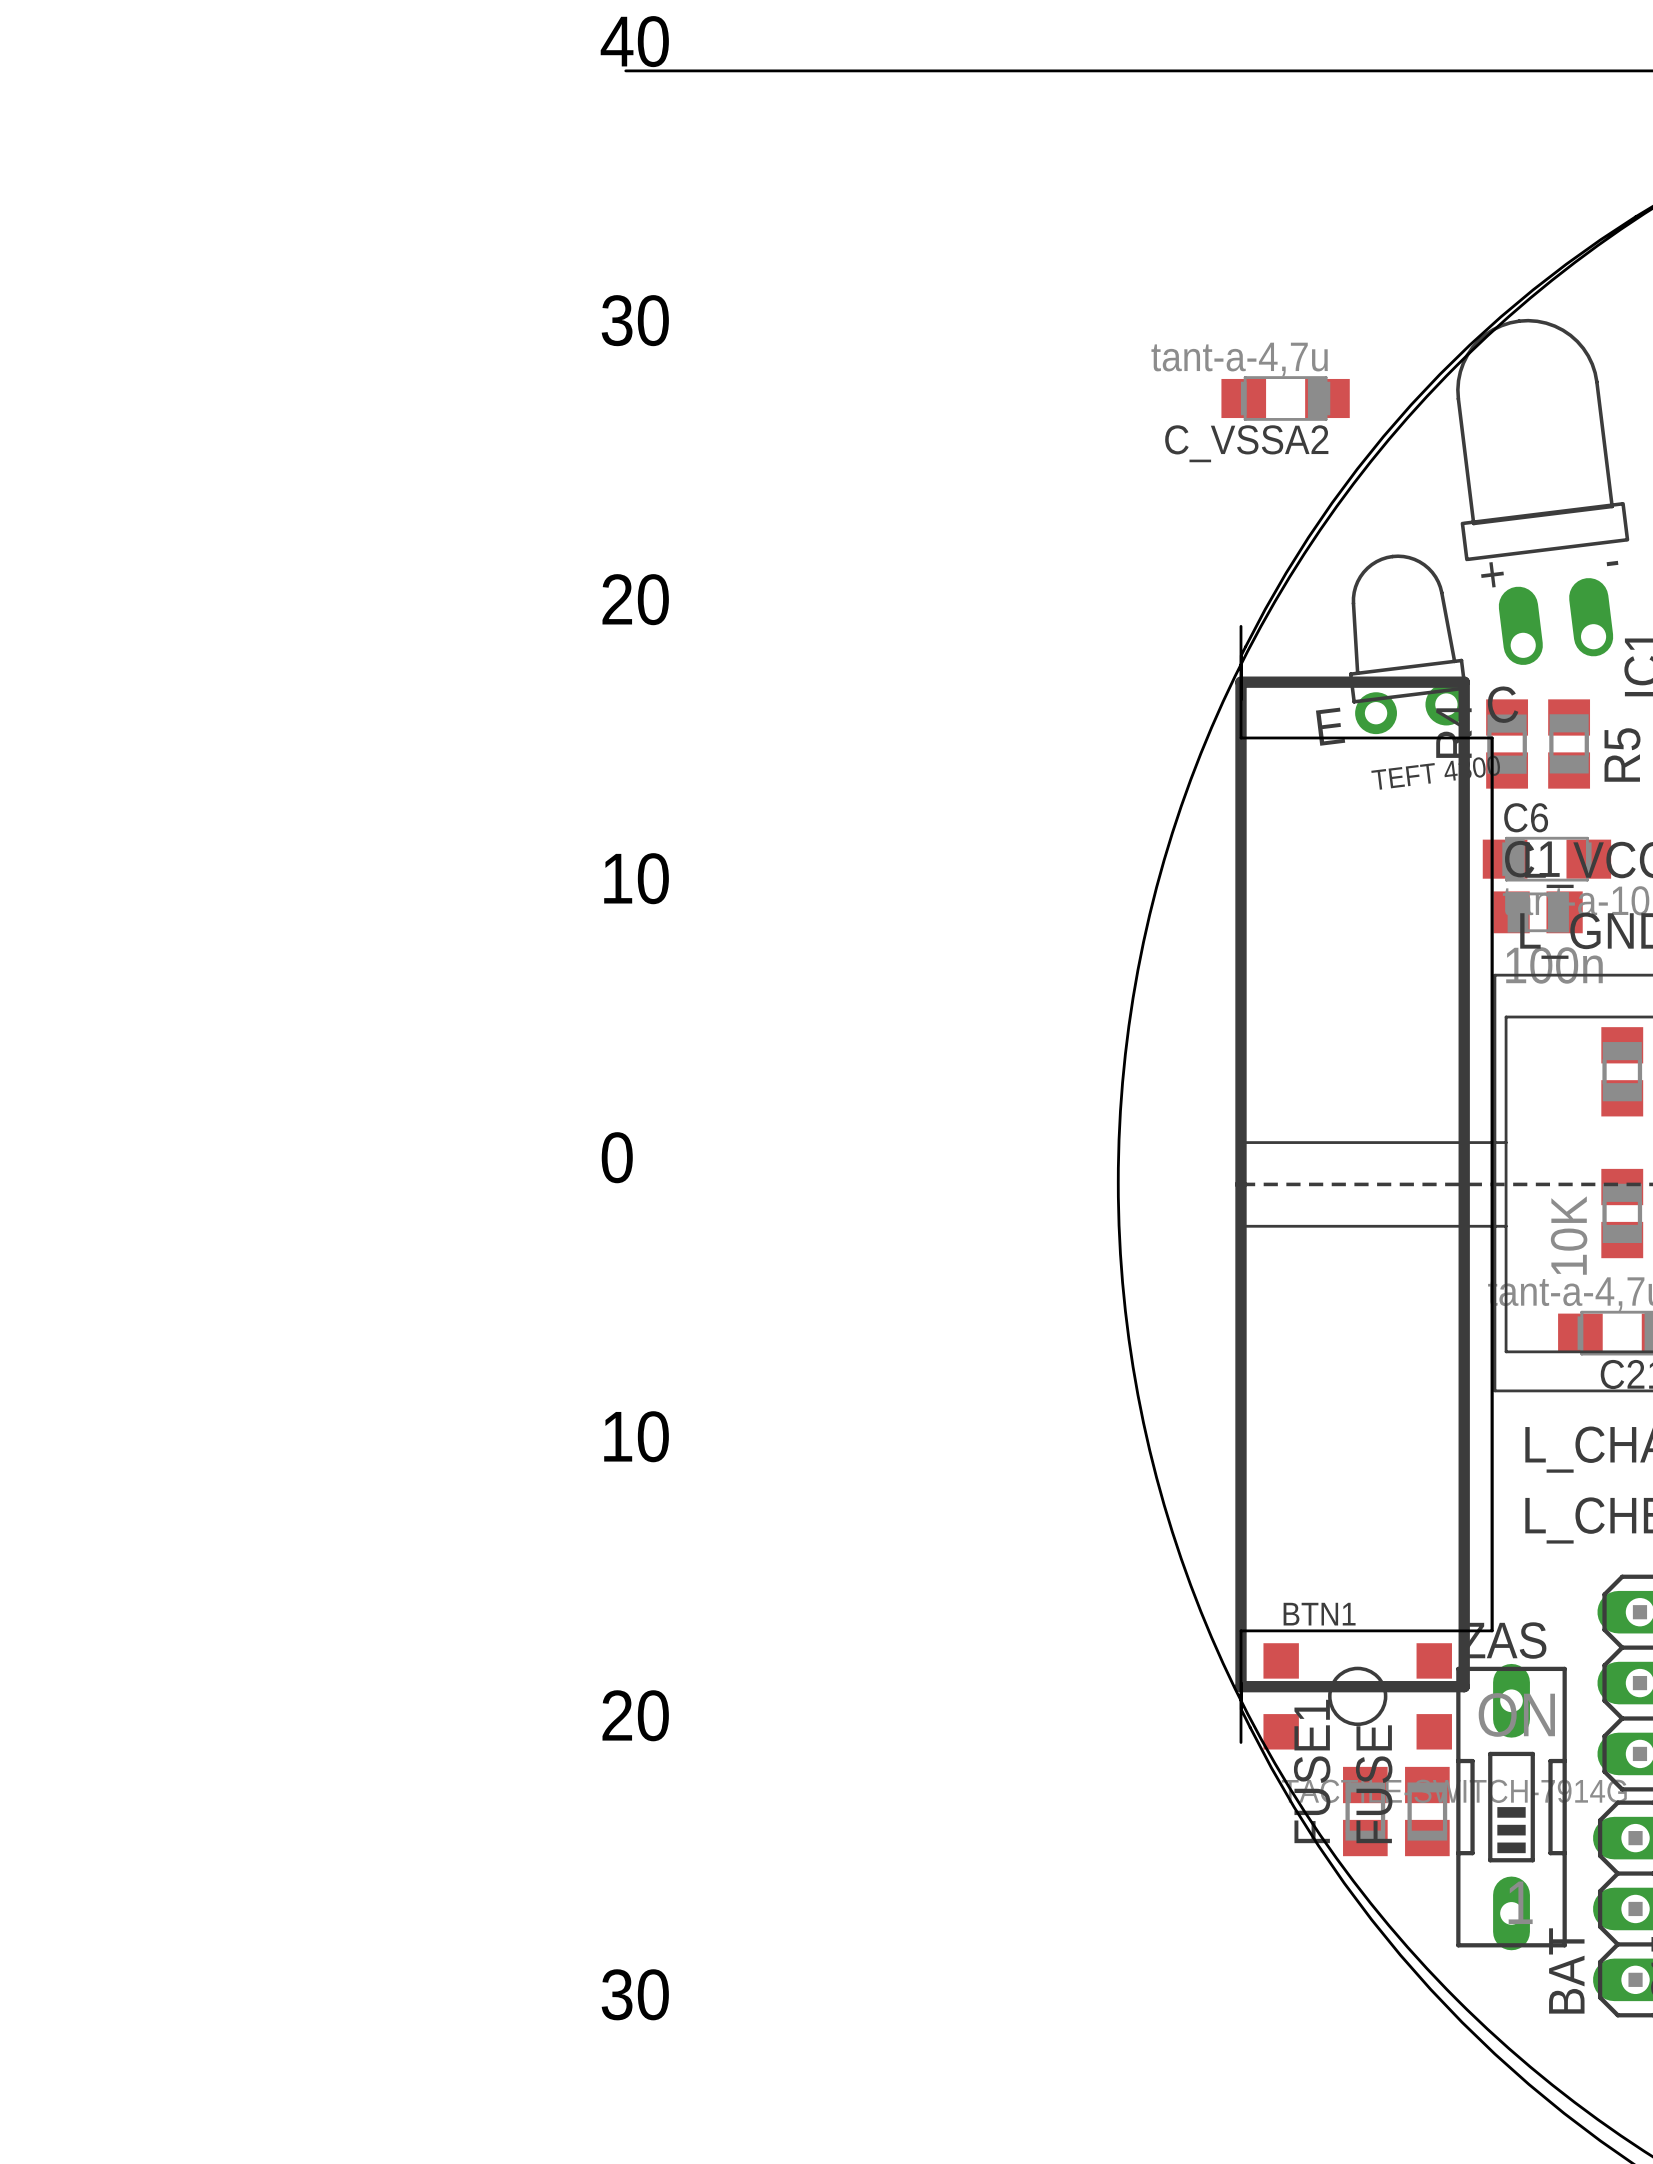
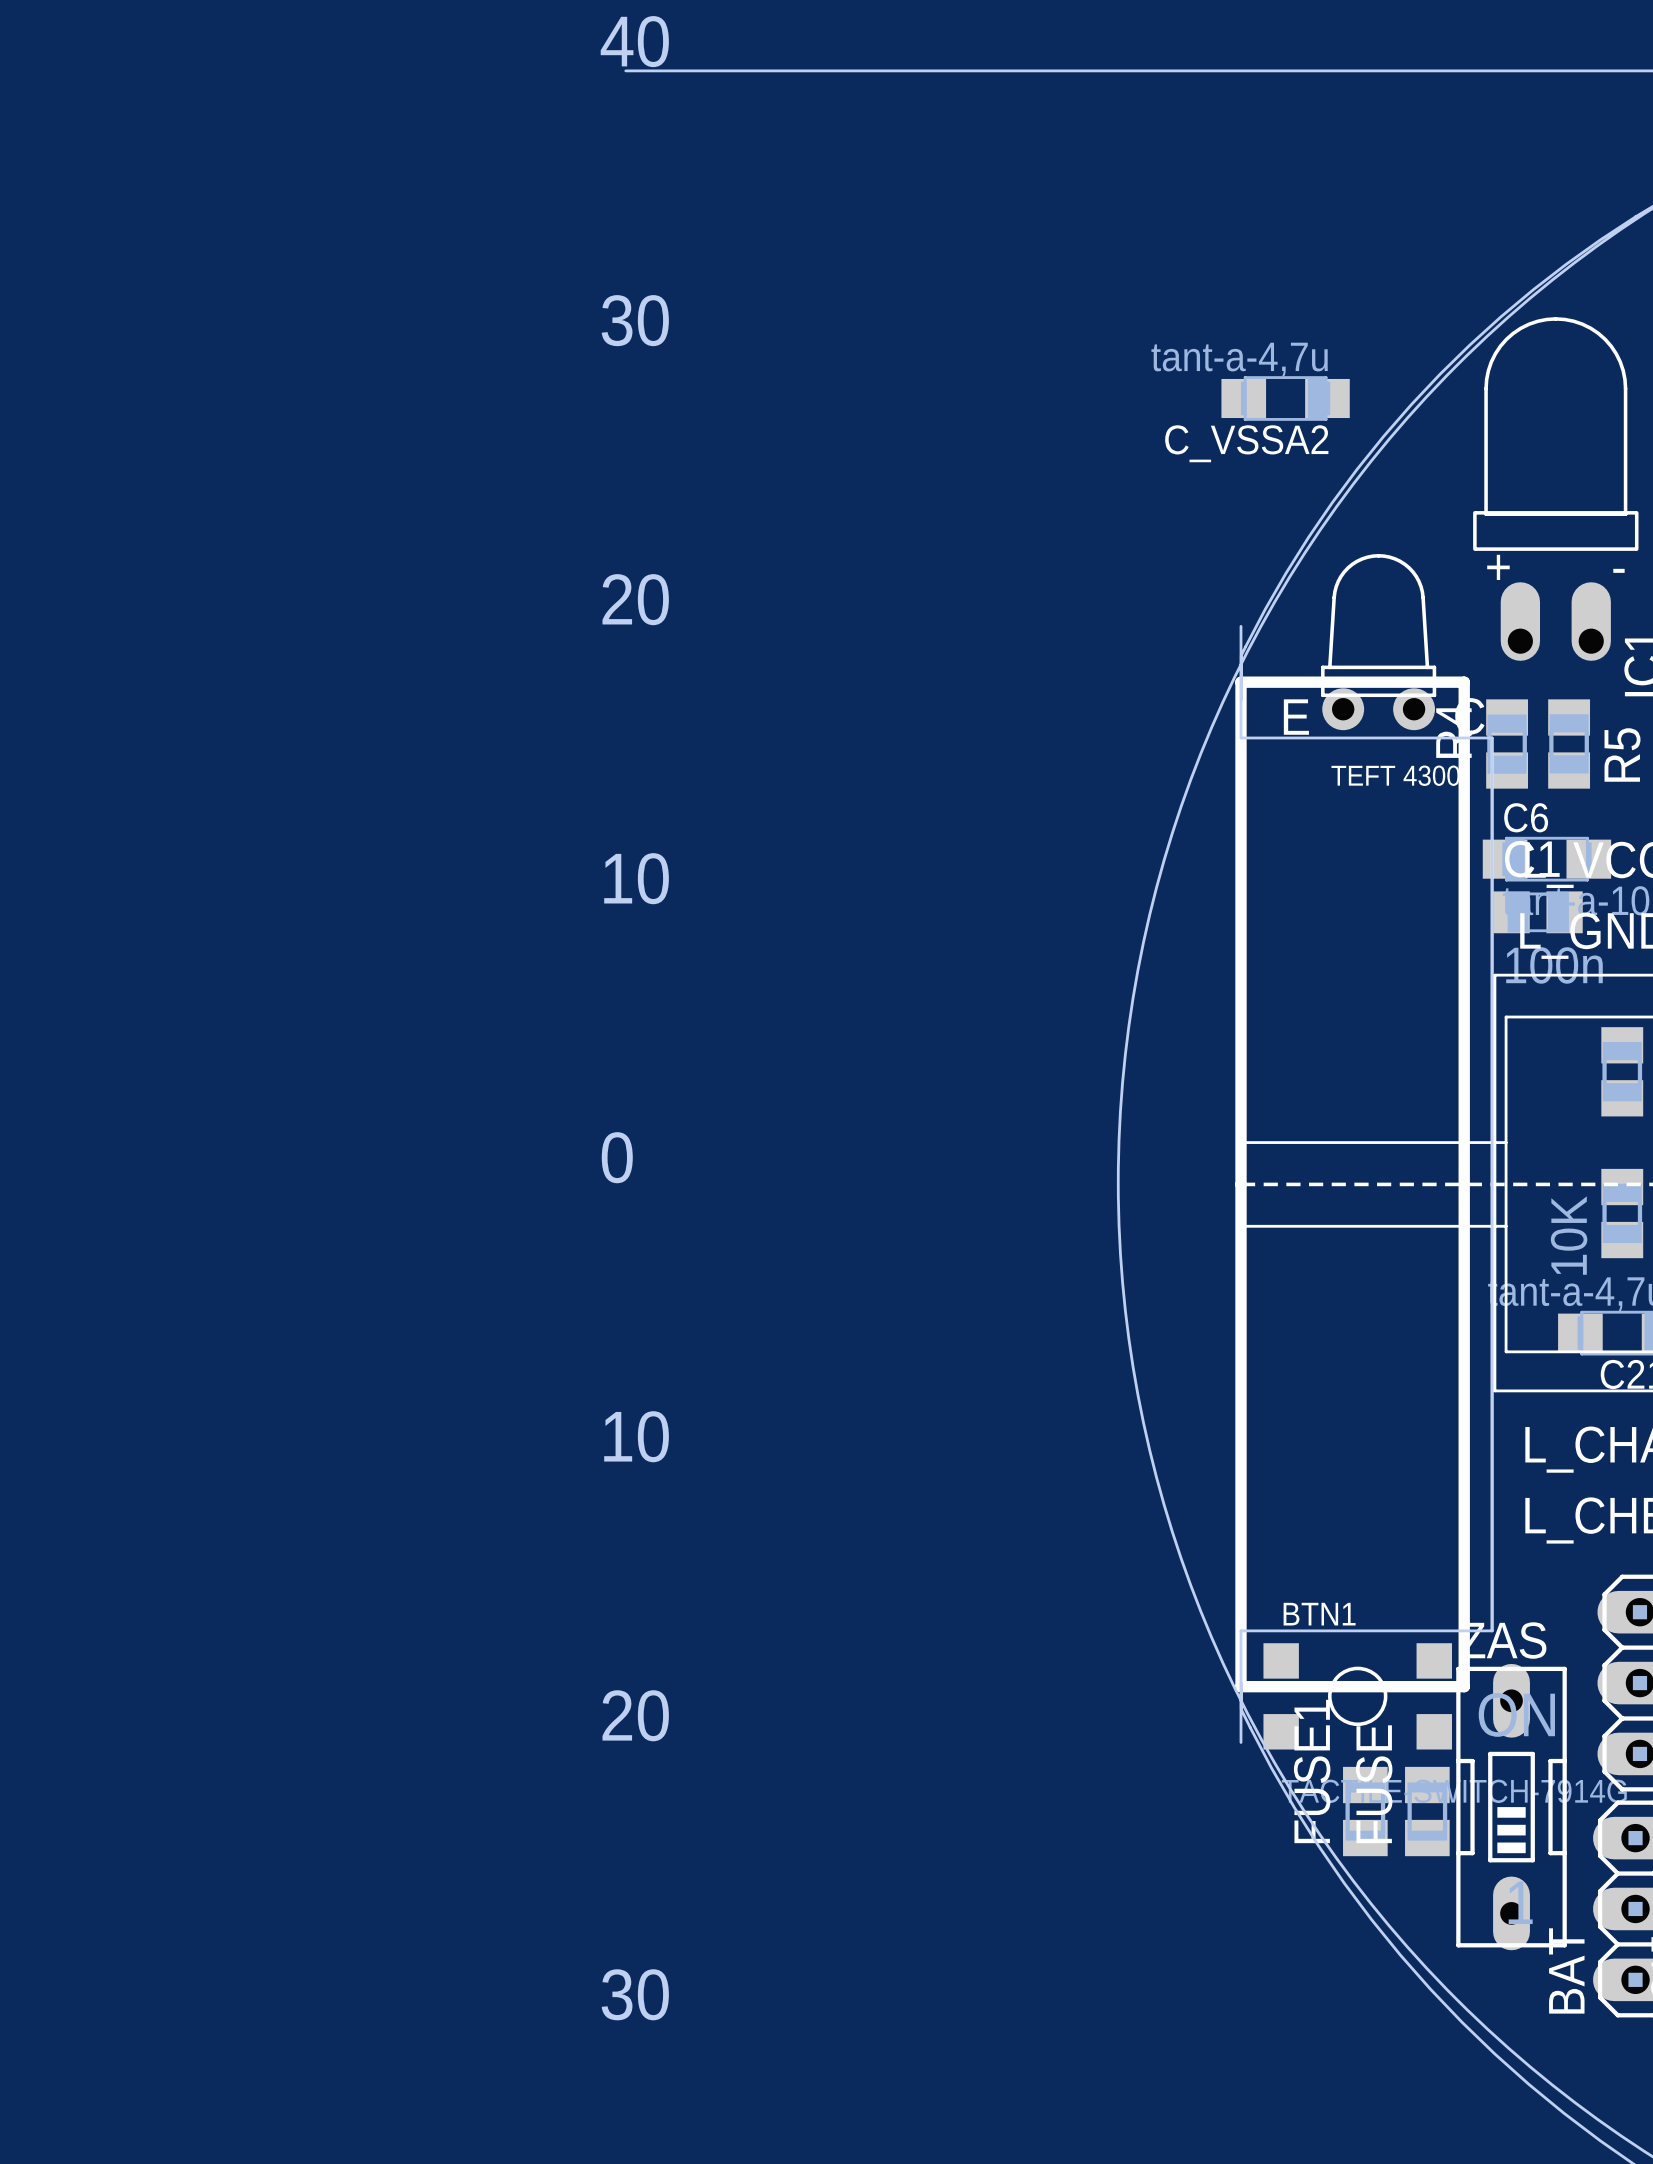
part rotation: 0° (1542, 491) -> 7° clockwise (1555, 488)
part: none -> (1378, 642)
part: (1408, 644) -> none

